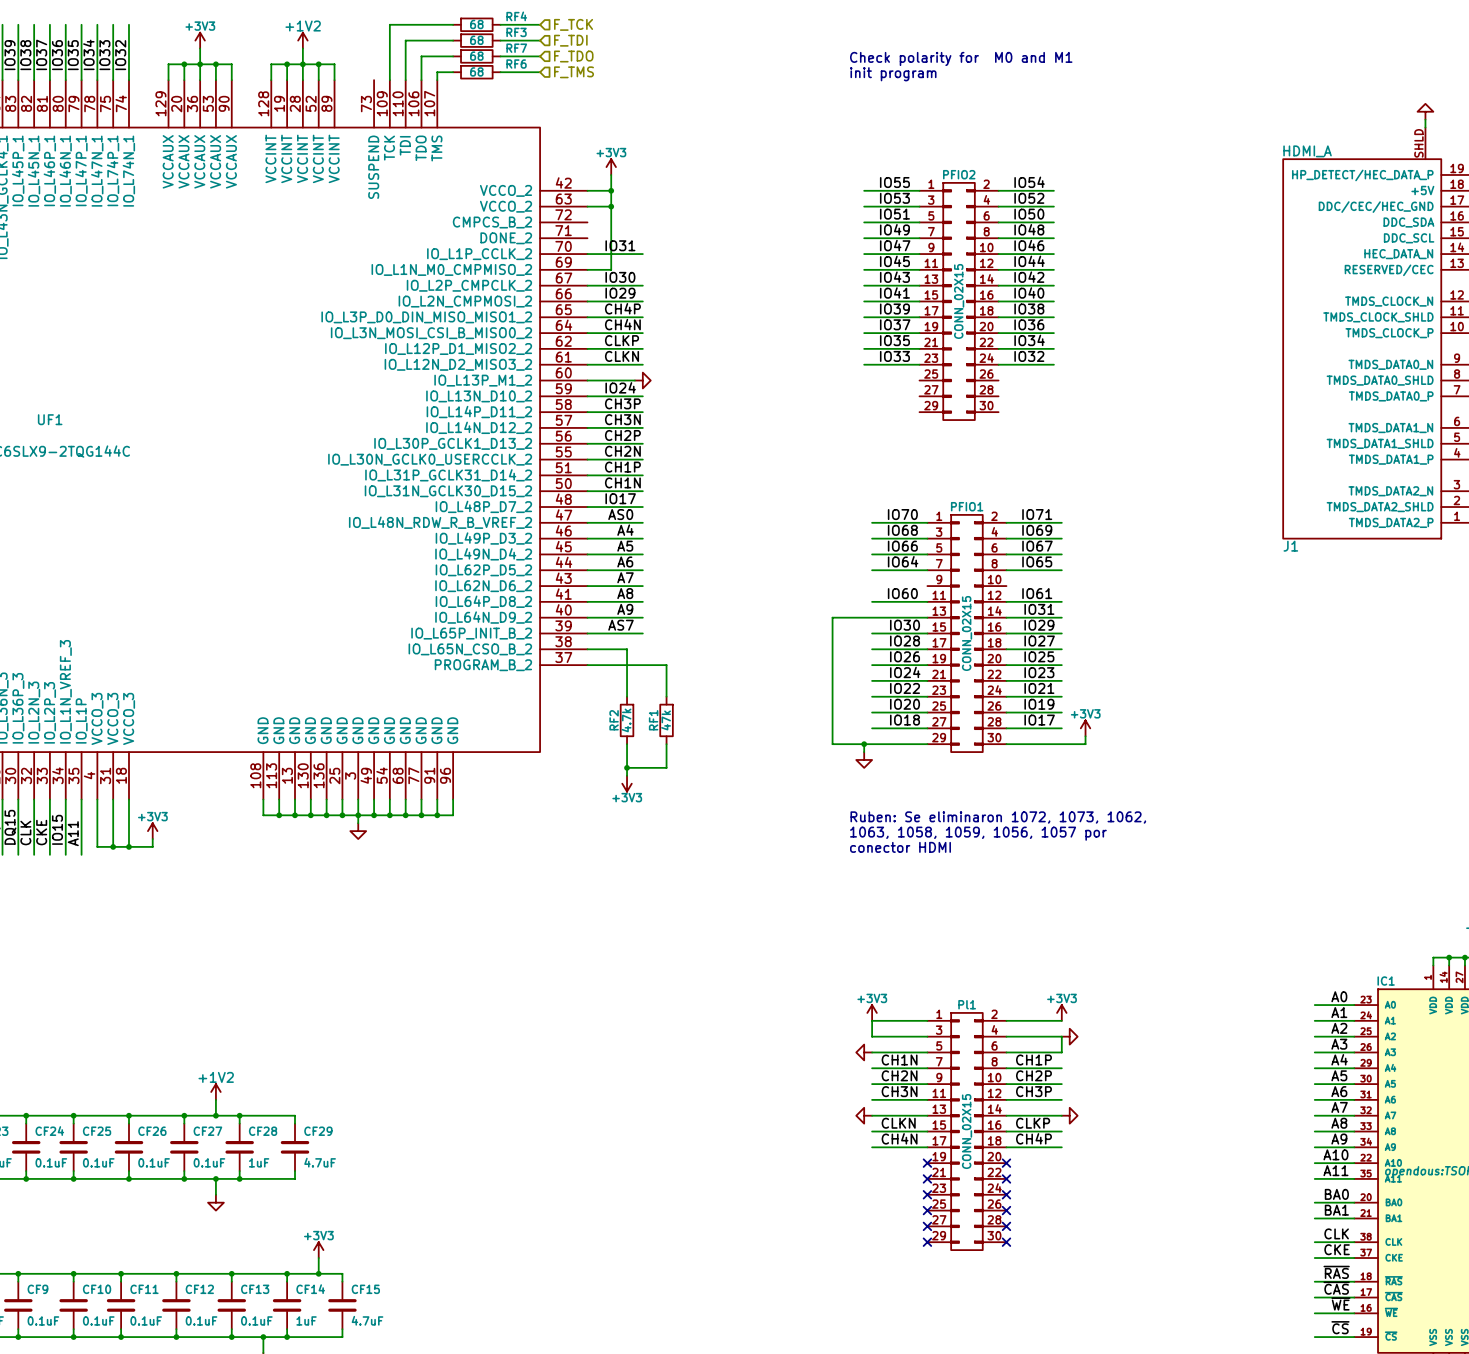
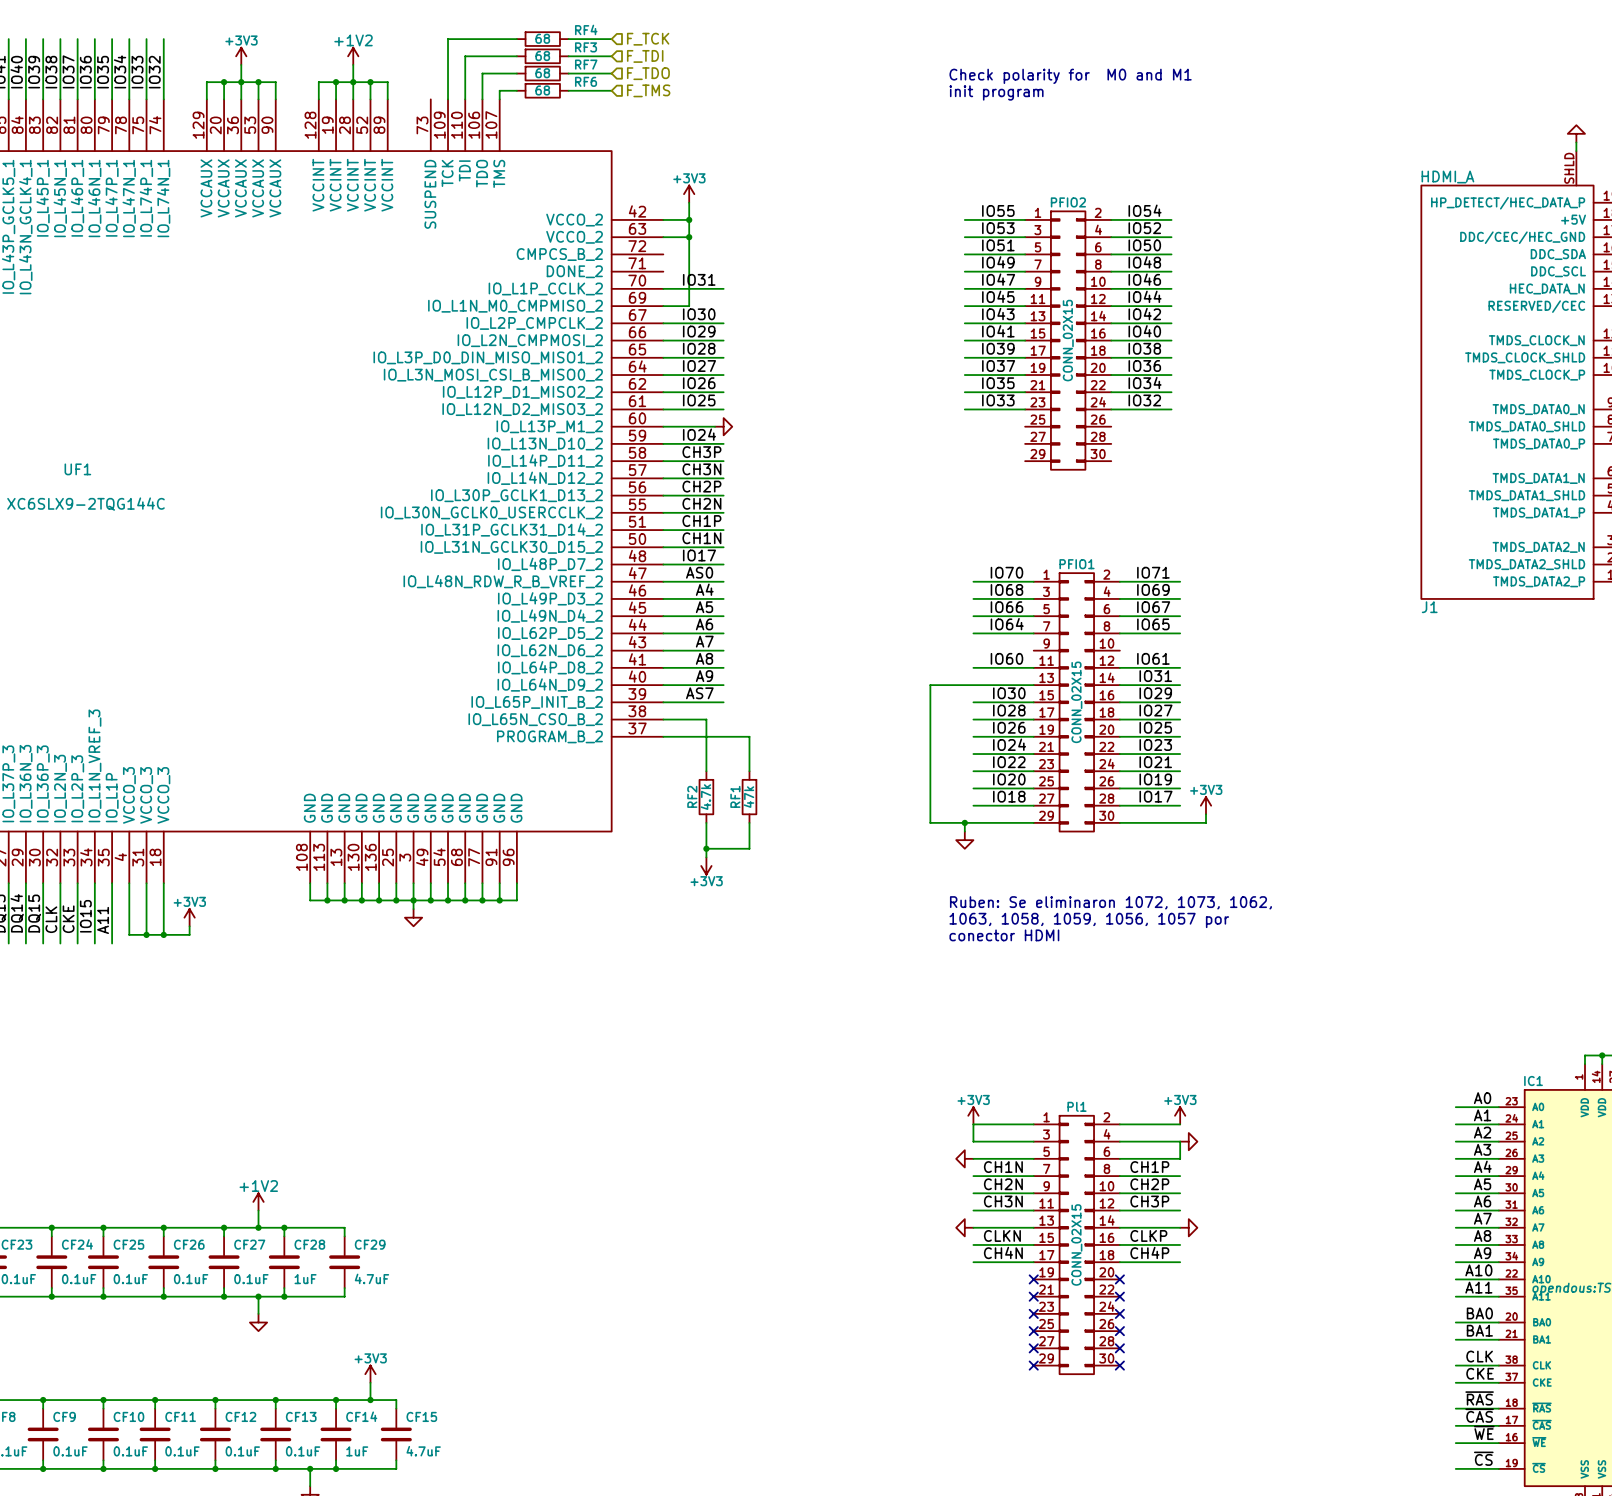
label: CH4P (622, 308) -> IO28 (699, 348)
label: CH4N (622, 324) -> IO27 (699, 366)
label: CLKP (622, 340) -> IO26 (699, 383)
label: CLKN (622, 356) -> IO25 (699, 400)

